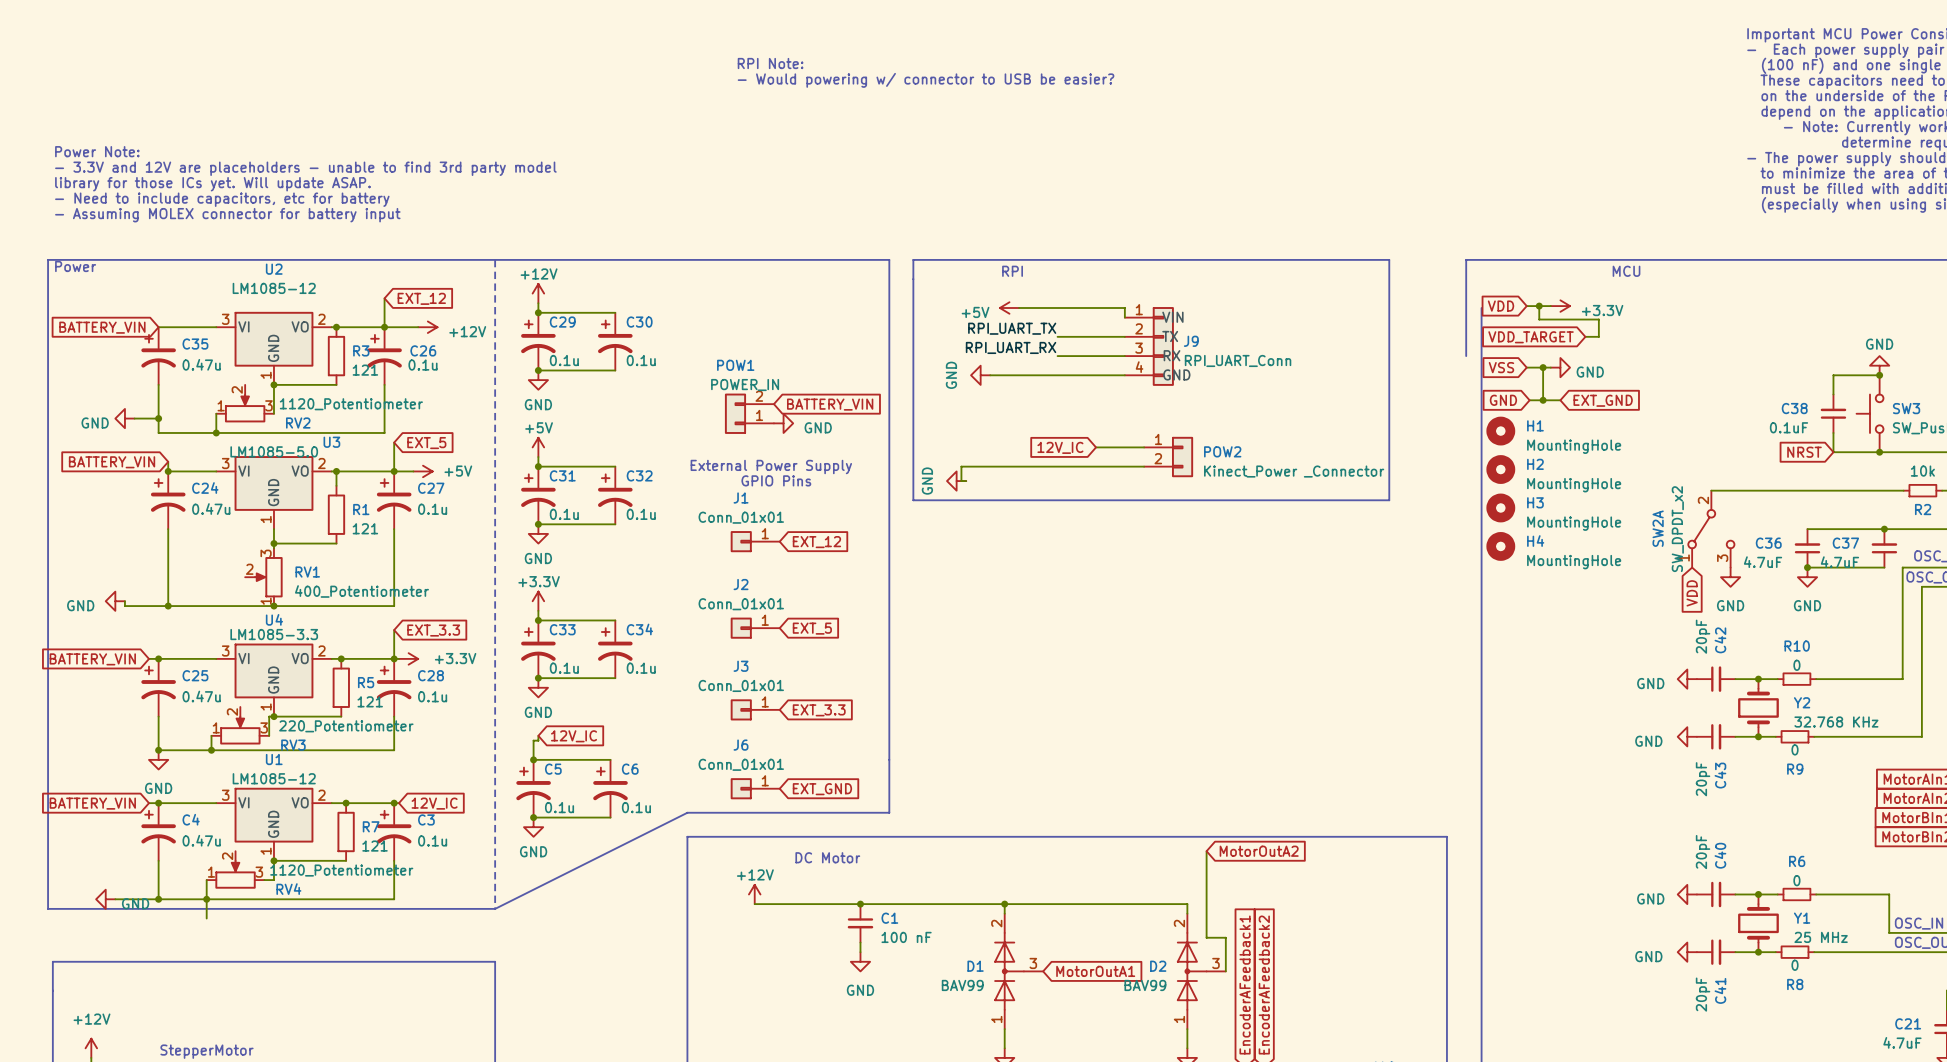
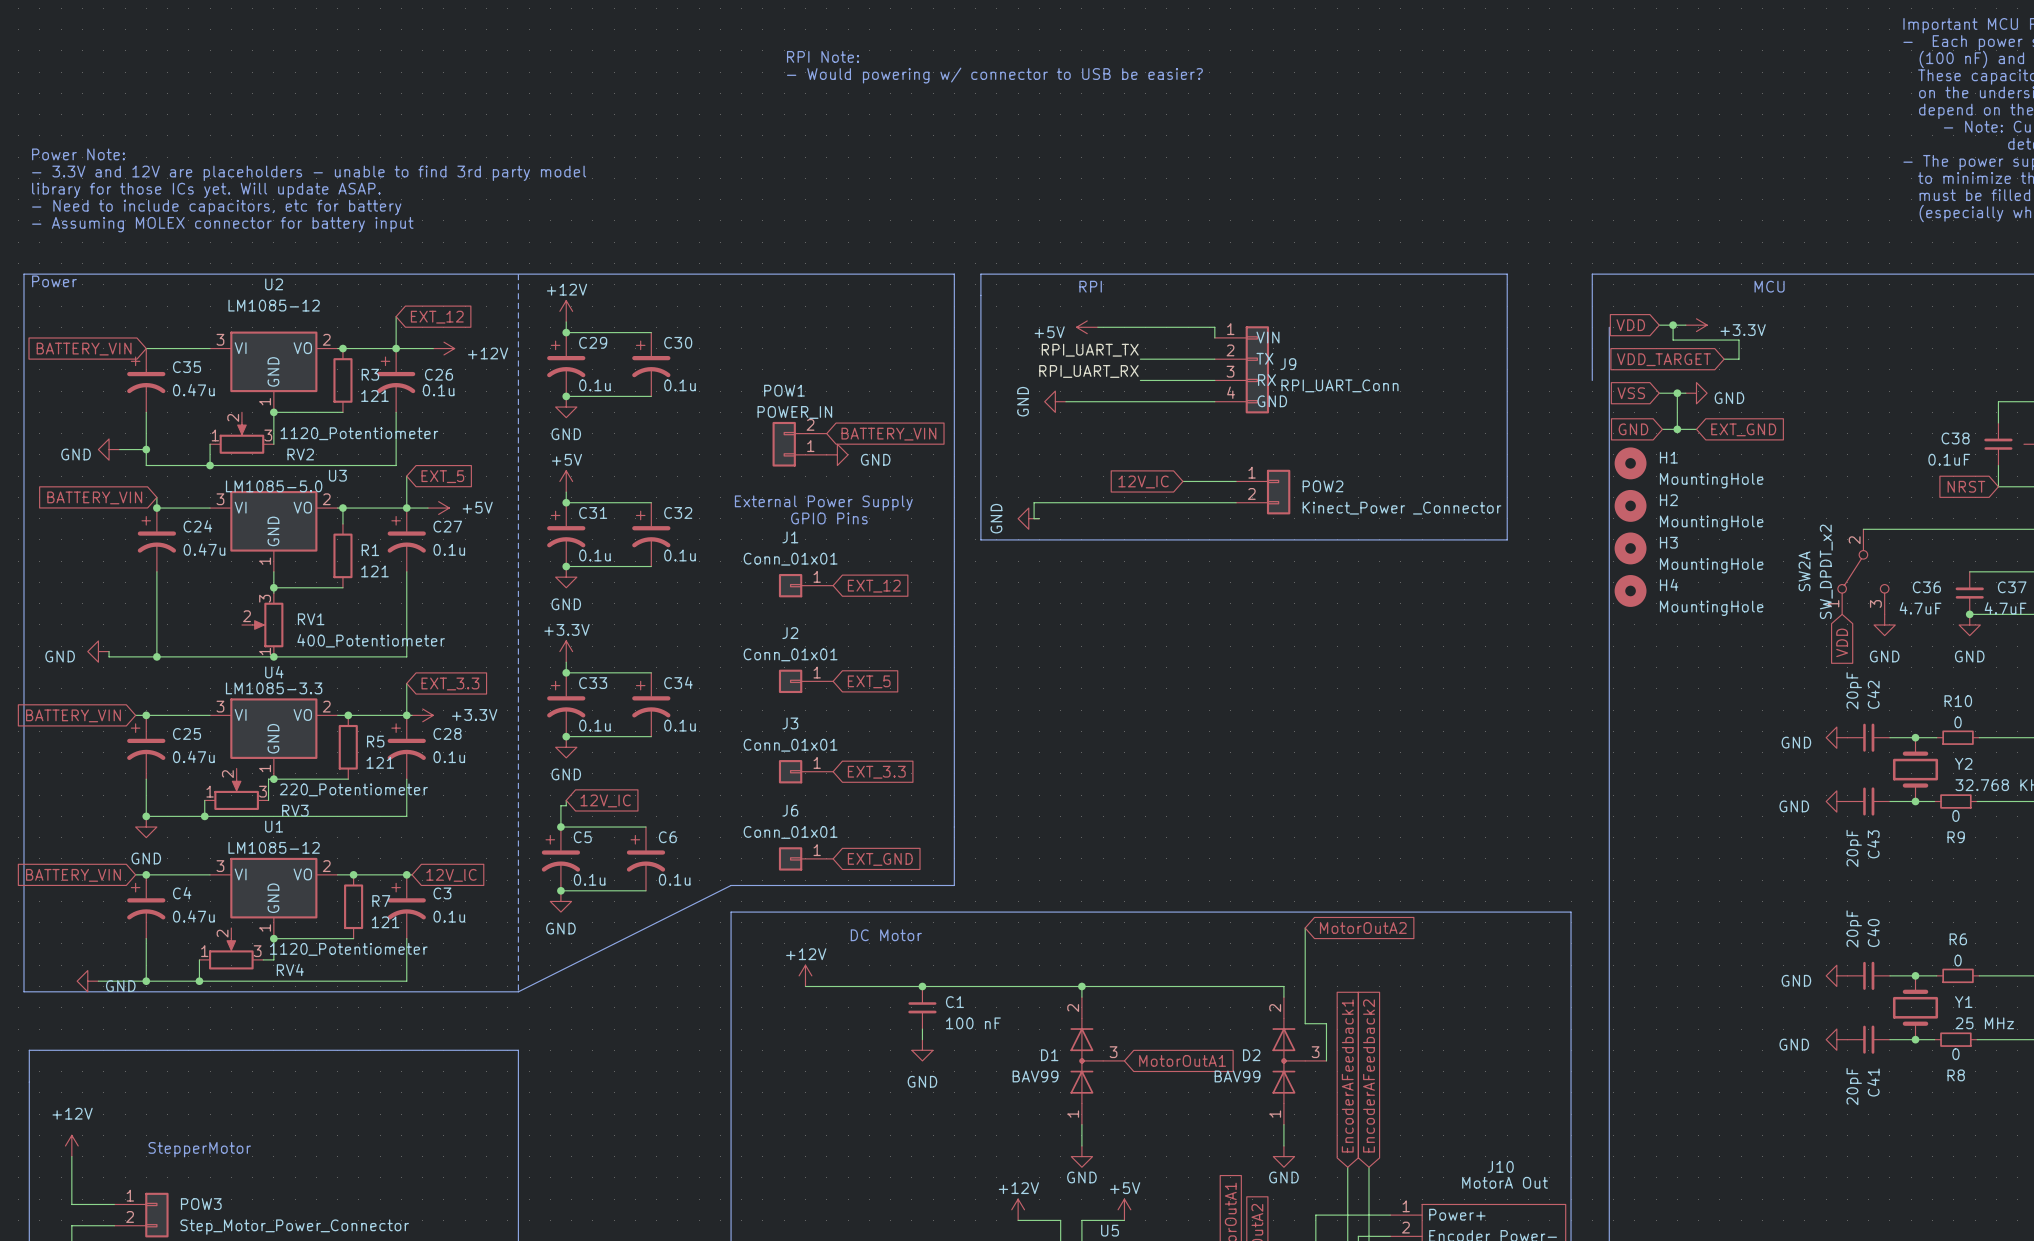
wire: (206, 899) (206, 918) -> none

